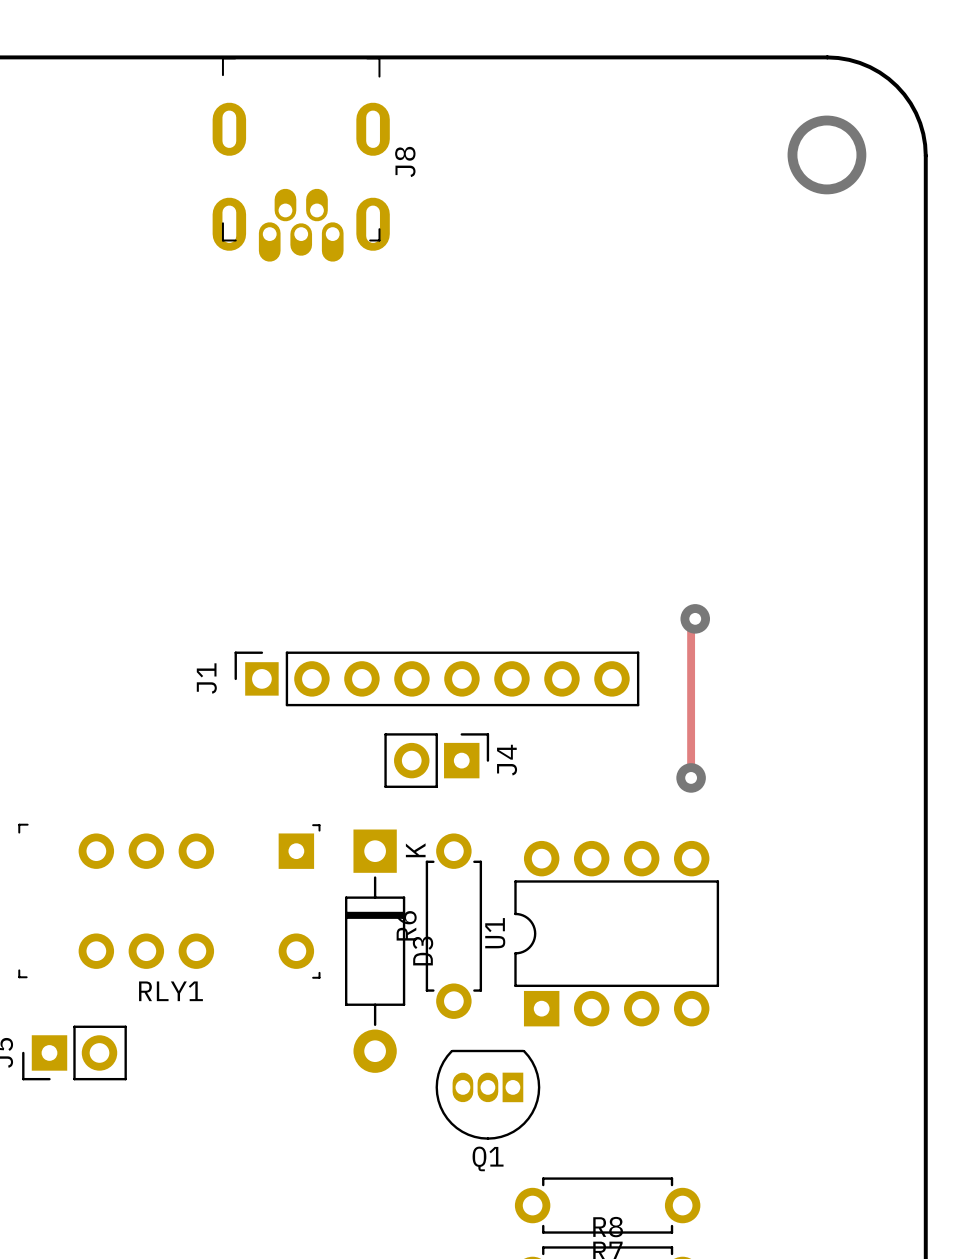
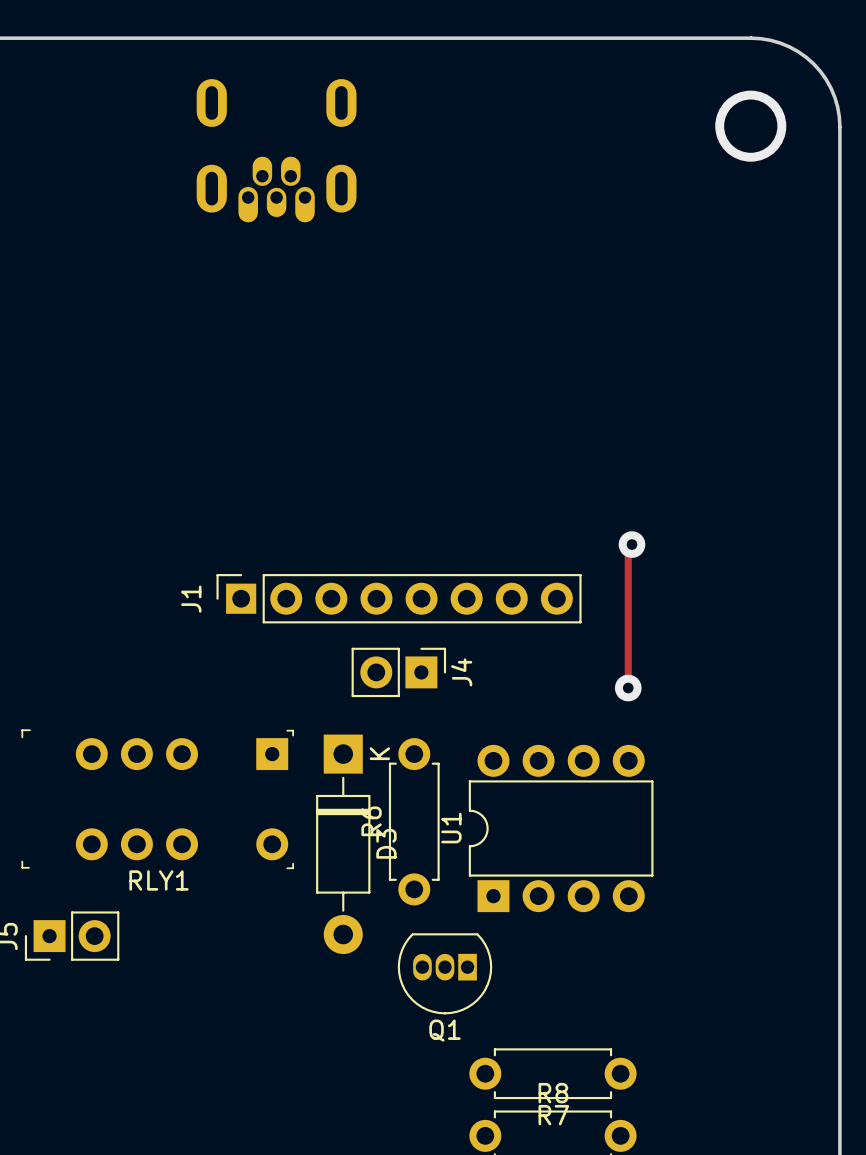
J8 side: top (301, 159) -> bottom (276, 150)

